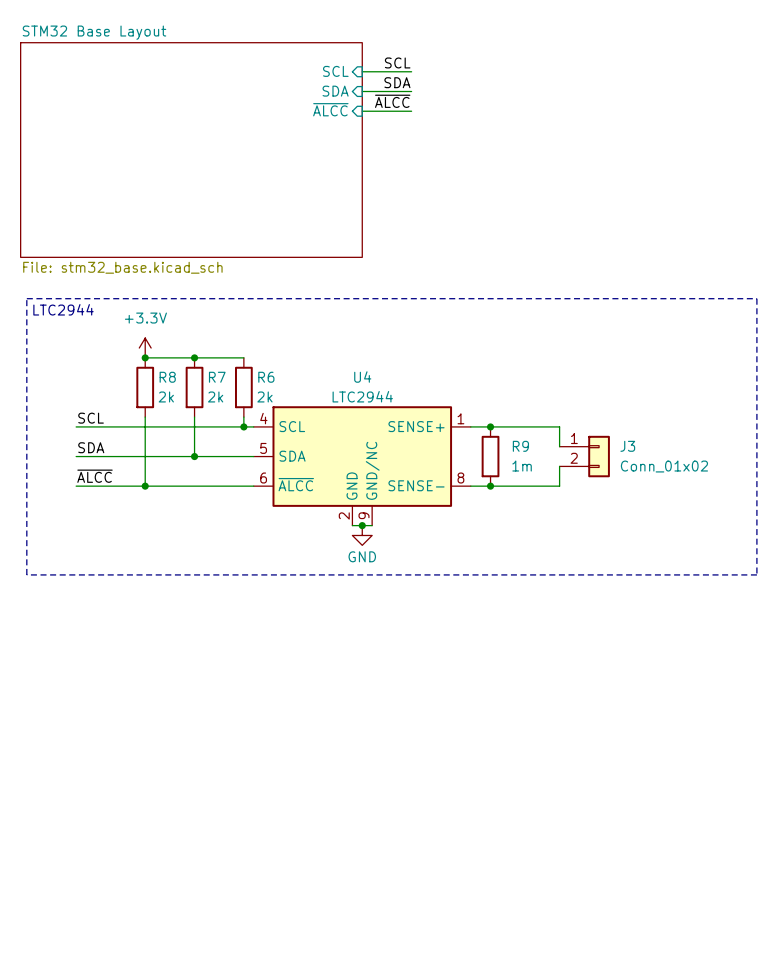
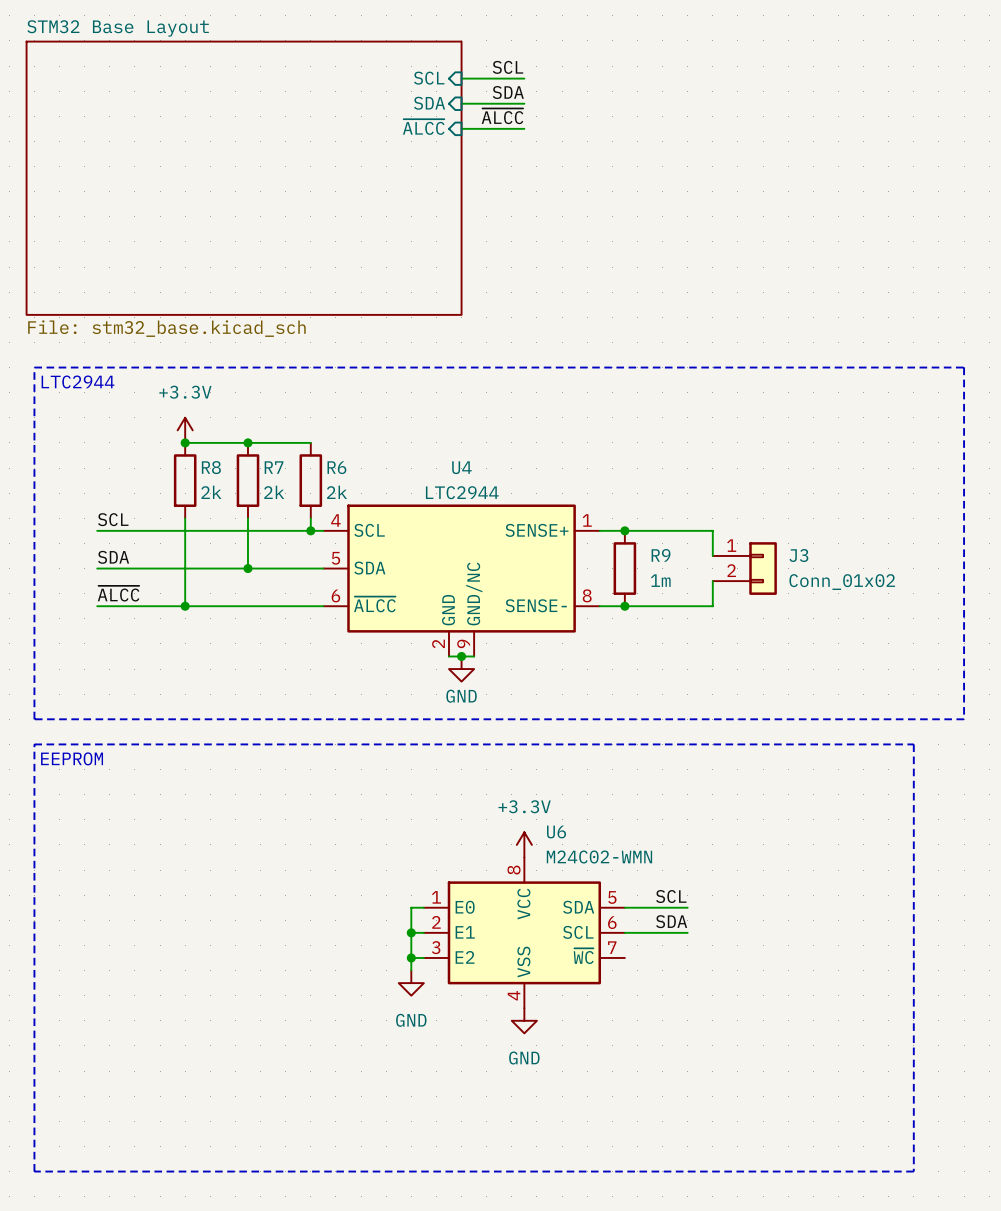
line: none -> (34, 744) (913, 744) (913, 1171) (34, 1171) (34, 744)
text: none -> EEPROM (72, 758)
power symbol: none -> +3.3V (524, 844)
label: none -> SCL (671, 896)
wire: none -> (423, 907) (411, 907) (411, 970)
wire: none -> (624, 907) (687, 907)
label: none -> SDA (671, 921)
wire: none -> (411, 932) (423, 932)
junction: none -> (411, 932)
U6: none -> M24C02-WMN (524, 932)
wire: none -> (624, 932) (687, 932)
wire: none -> (411, 957) (423, 957)
junction: none -> (411, 957)
power symbol: none -> GND (411, 983)
power symbol: none -> GND (524, 1020)

